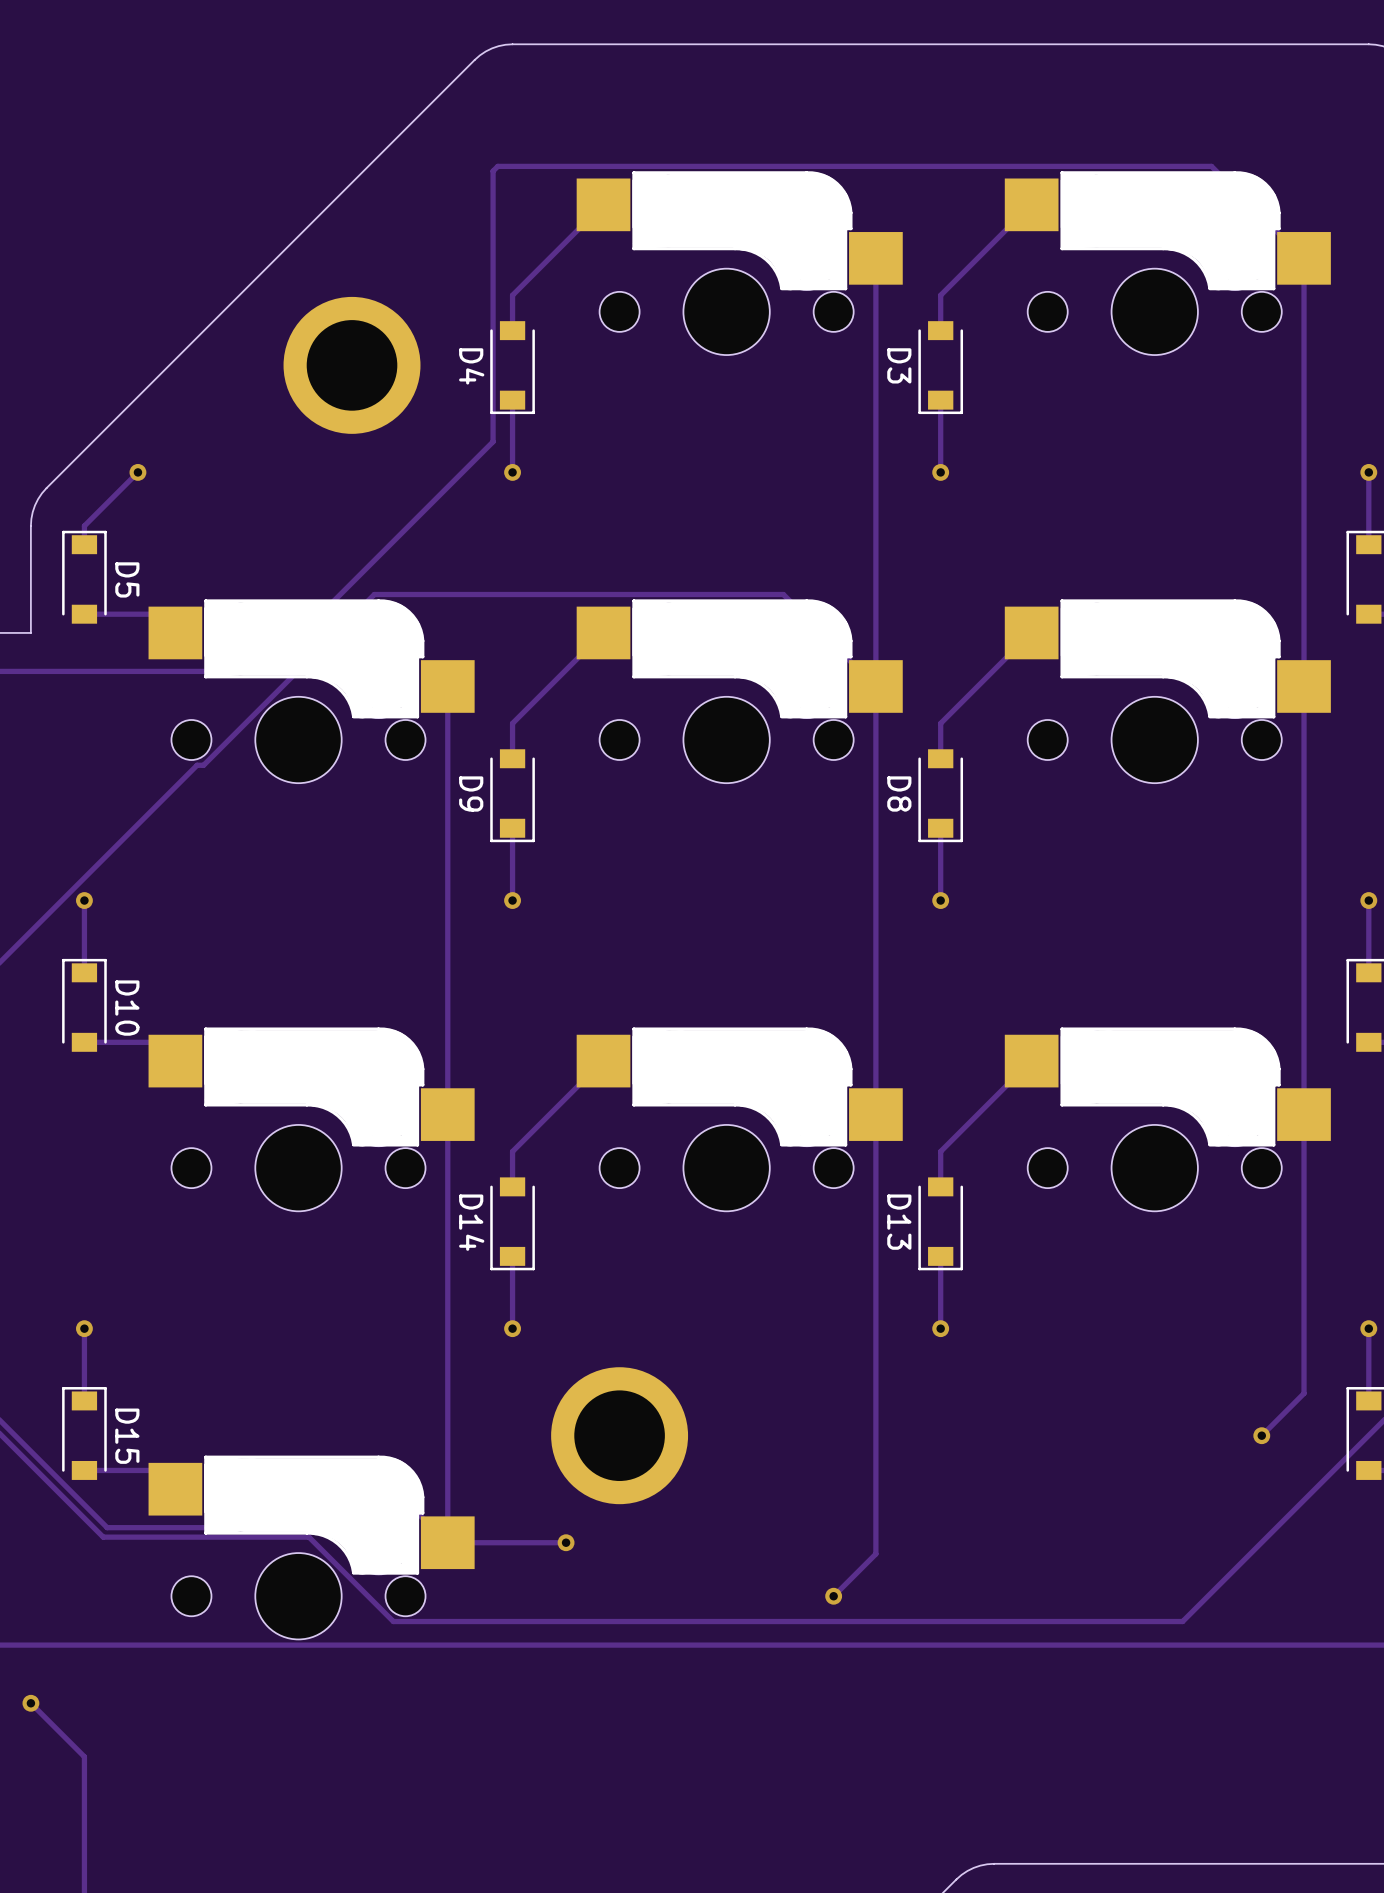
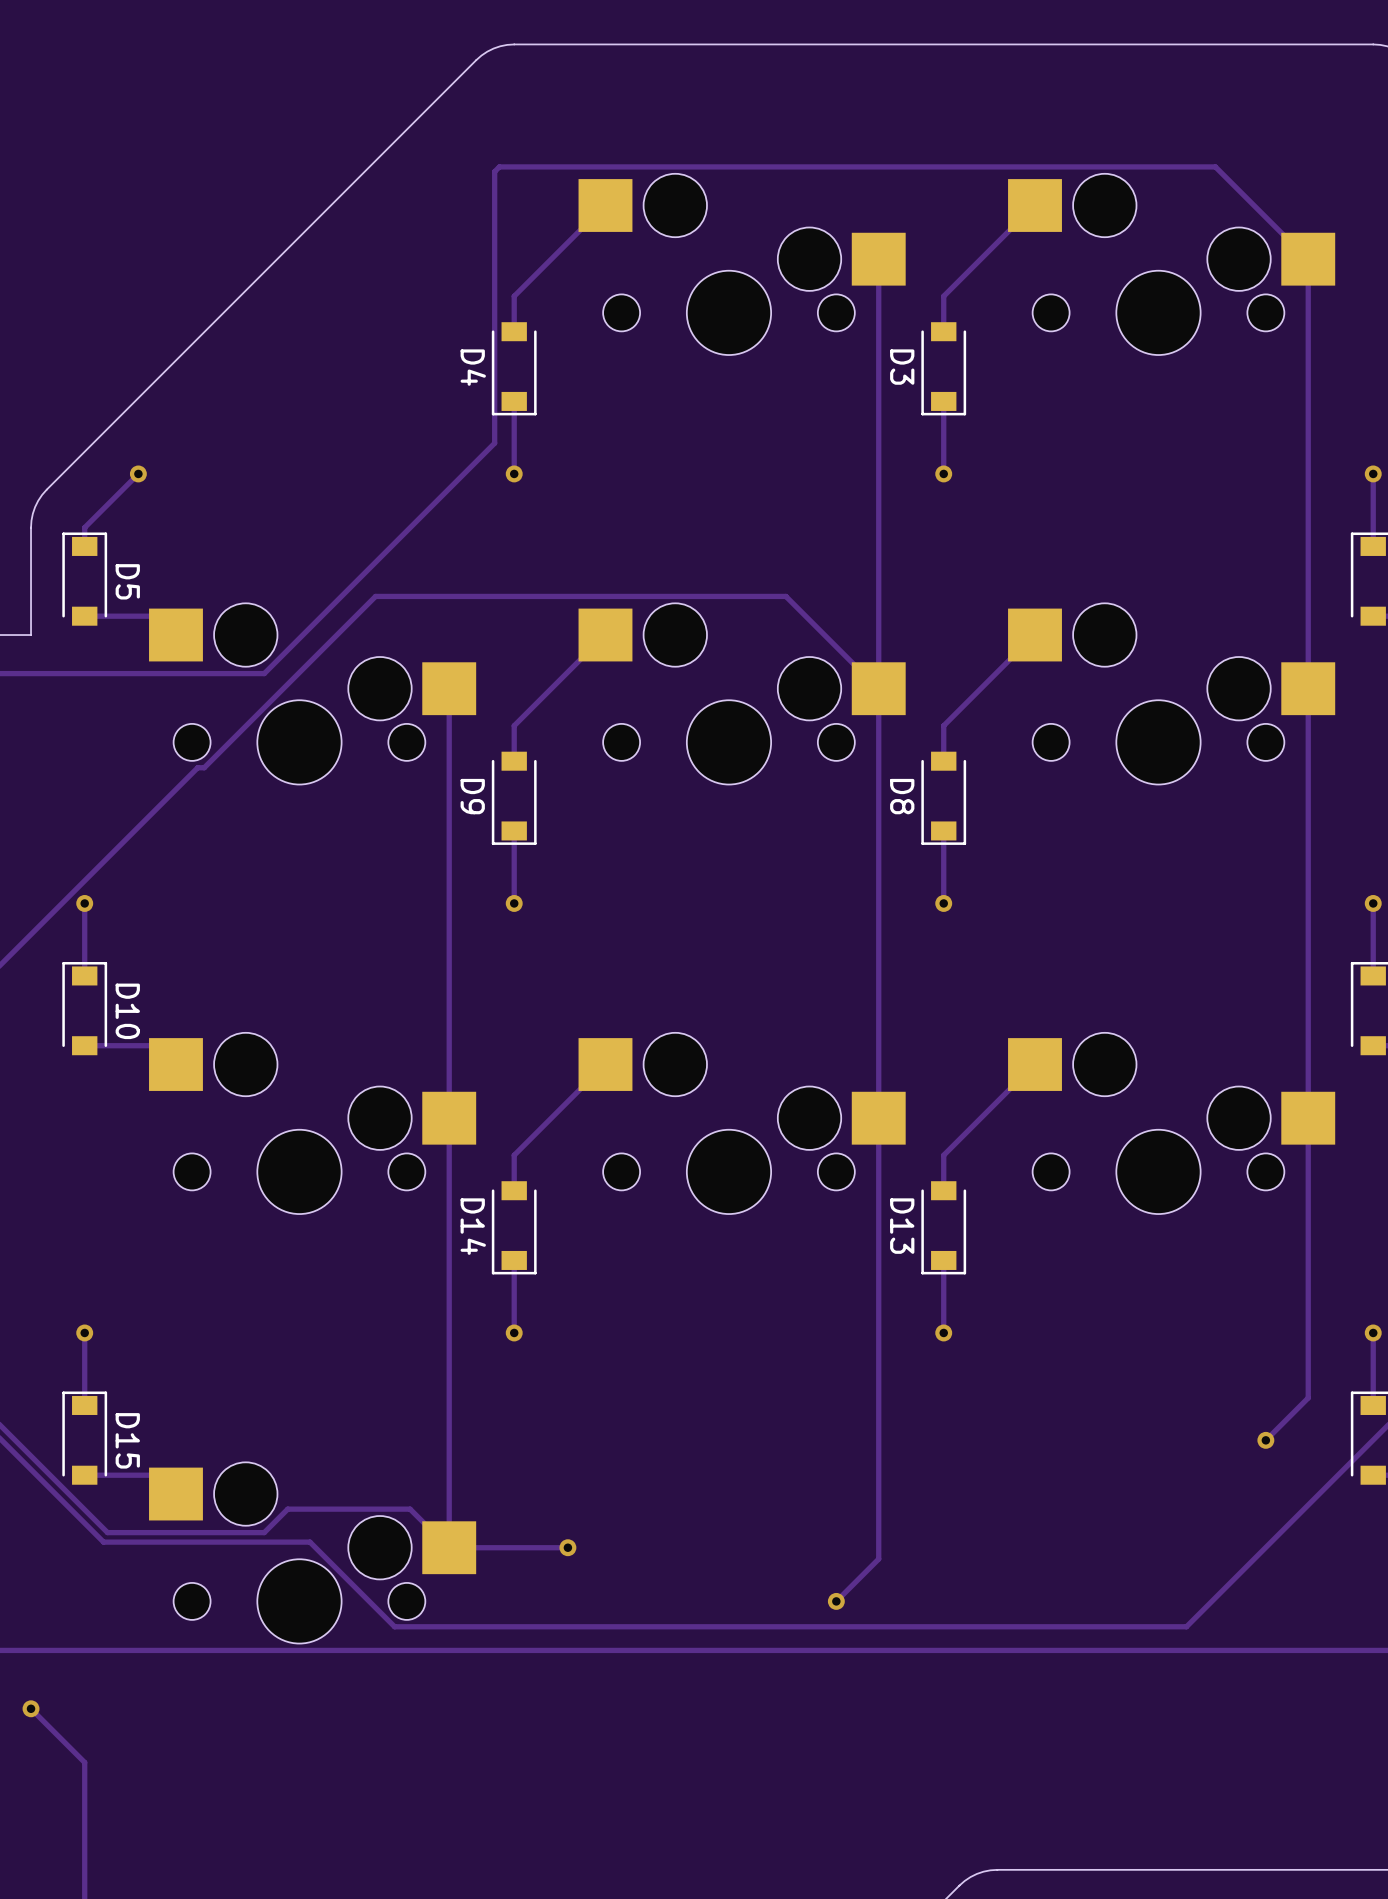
part footprint: [576, 171, 903, 356] -> [578, 173, 906, 356]
part footprint: [1004, 171, 1331, 356] -> [1008, 173, 1336, 356]
part: (352, 365) -> none
part footprint: [148, 599, 475, 784] -> [149, 603, 477, 785]
part footprint: [576, 599, 903, 784] -> [578, 603, 906, 785]
part footprint: [1004, 599, 1331, 784] -> [1008, 603, 1336, 785]
part footprint: [148, 1027, 475, 1212] -> [149, 1032, 477, 1215]
part footprint: [576, 1027, 903, 1212] -> [578, 1032, 906, 1215]
part footprint: [1004, 1027, 1331, 1212] -> [1008, 1032, 1336, 1215]
part: (619, 1435) -> none
part footprint: [148, 1455, 475, 1640] -> [149, 1462, 477, 1644]

